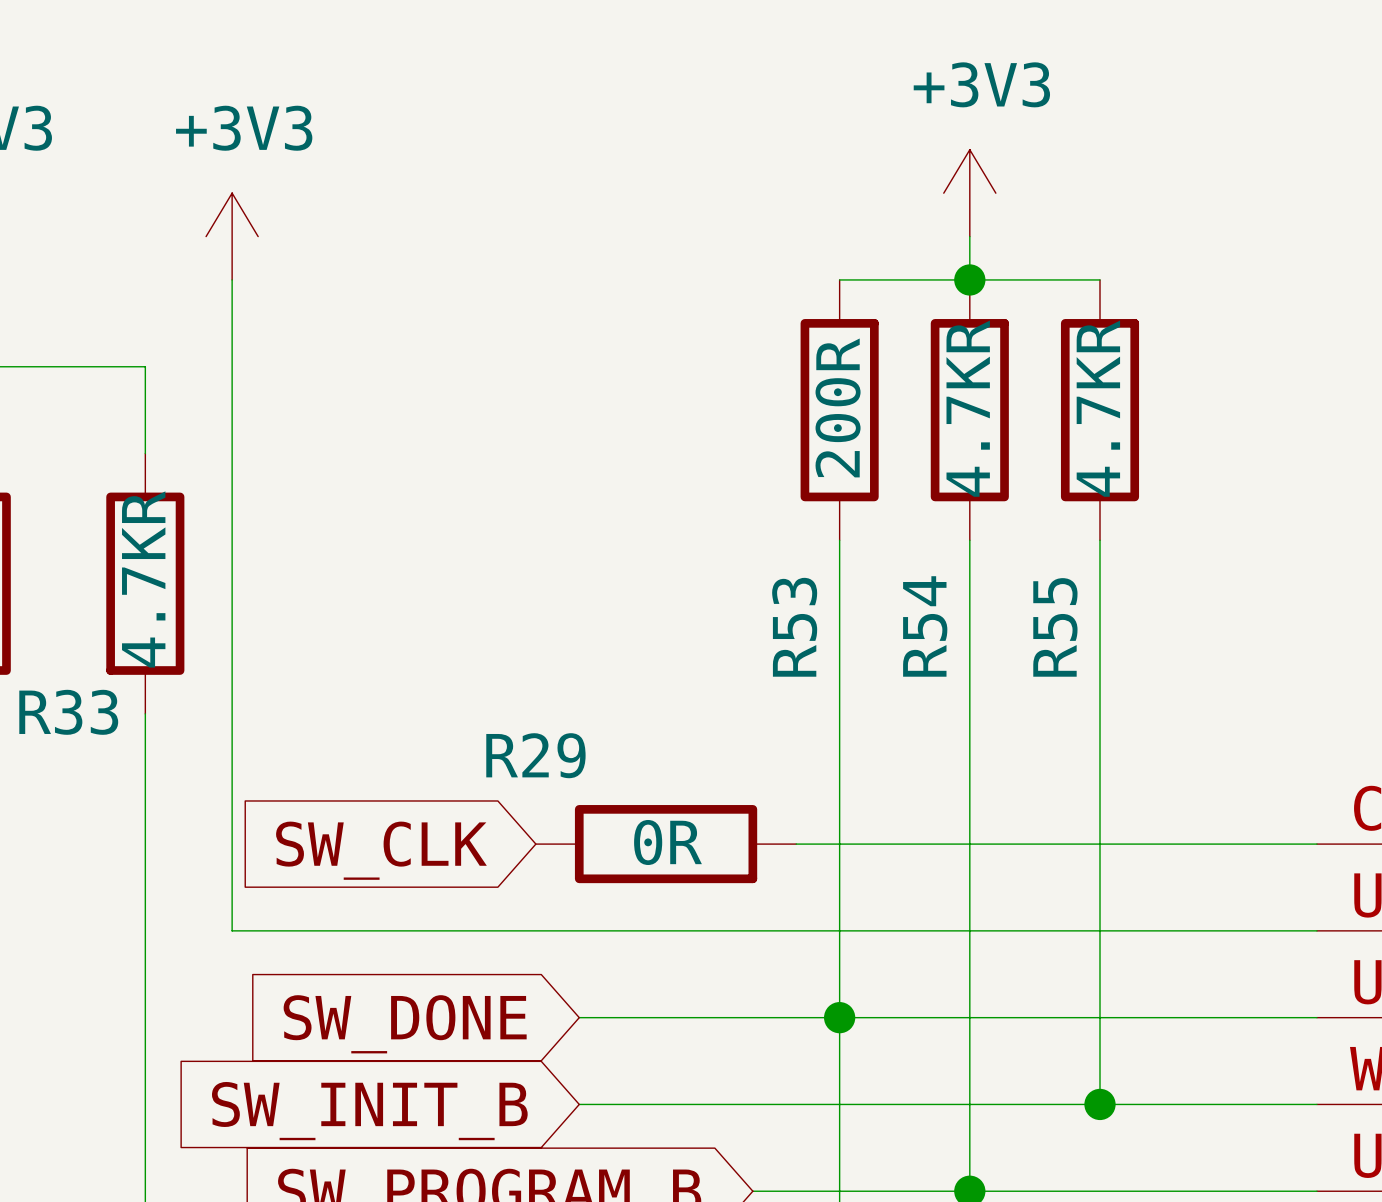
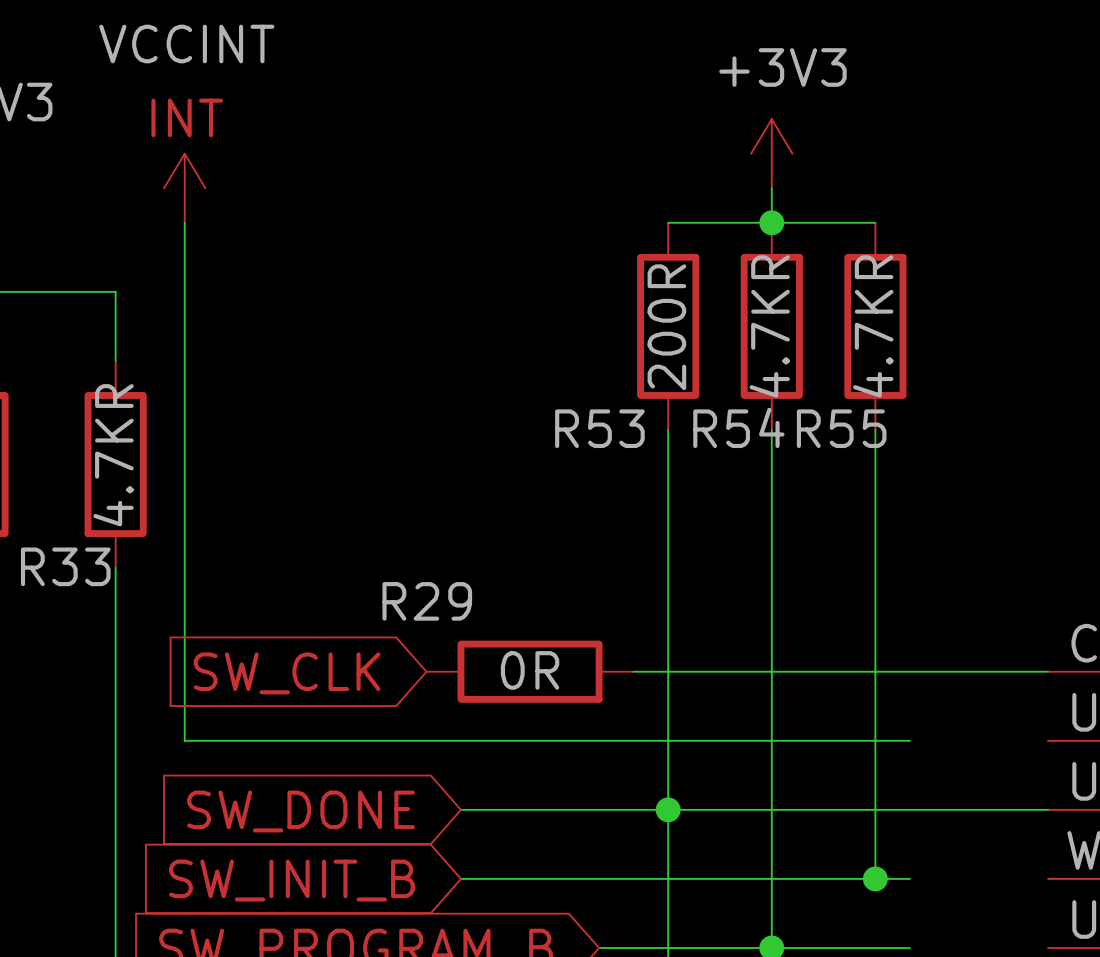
power symbol: +3V3 (232, 236) -> VCCINT (184, 188)
R54 name rotation: 0° (925, 626) -> 90° clockwise (738, 427)
R53 name rotation: 0° (794, 627) -> 90° clockwise (599, 428)
R55 name rotation: 0° (1055, 627) -> 90° clockwise (841, 428)
wire: (1143, 930) (1316, 930) -> none
wire: (1143, 1104) (1316, 1104) -> none
wire: (1143, 1191) (1316, 1191) -> none

